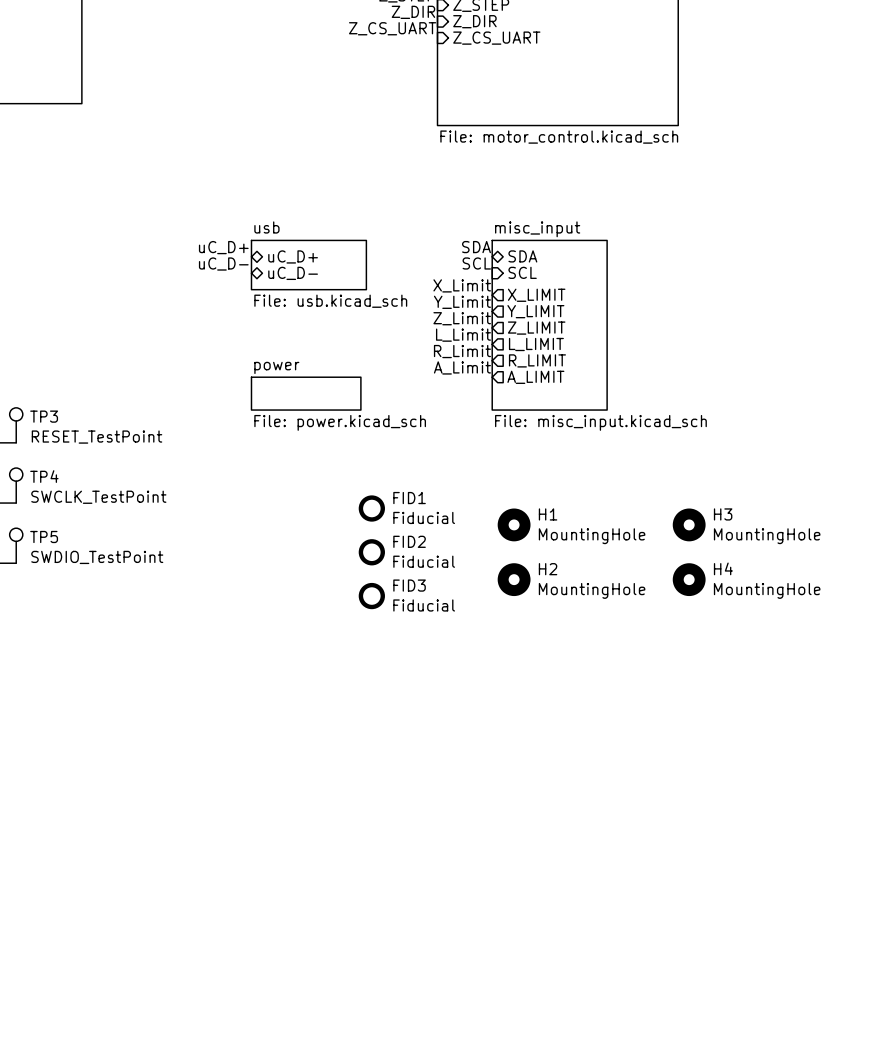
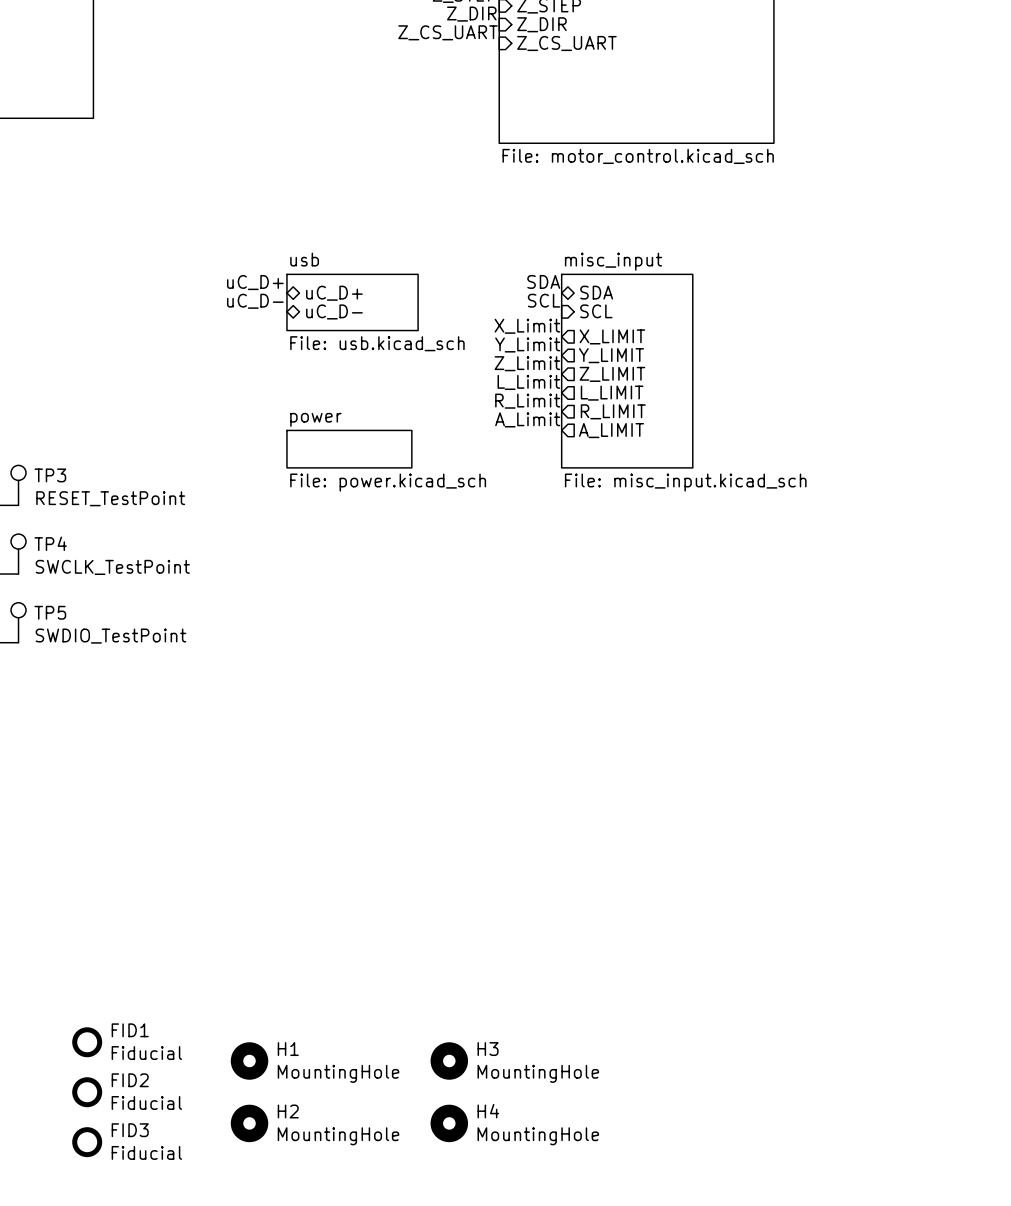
FID1 position: (371, 508) -> (87, 1042)
H1 position: (514, 524) -> (249, 1061)
H3 position: (689, 524) -> (449, 1061)
FID2 position: (371, 552) -> (87, 1092)
H2 position: (514, 579) -> (249, 1123)
H4 position: (689, 579) -> (449, 1123)
FID3 position: (371, 596) -> (87, 1142)

